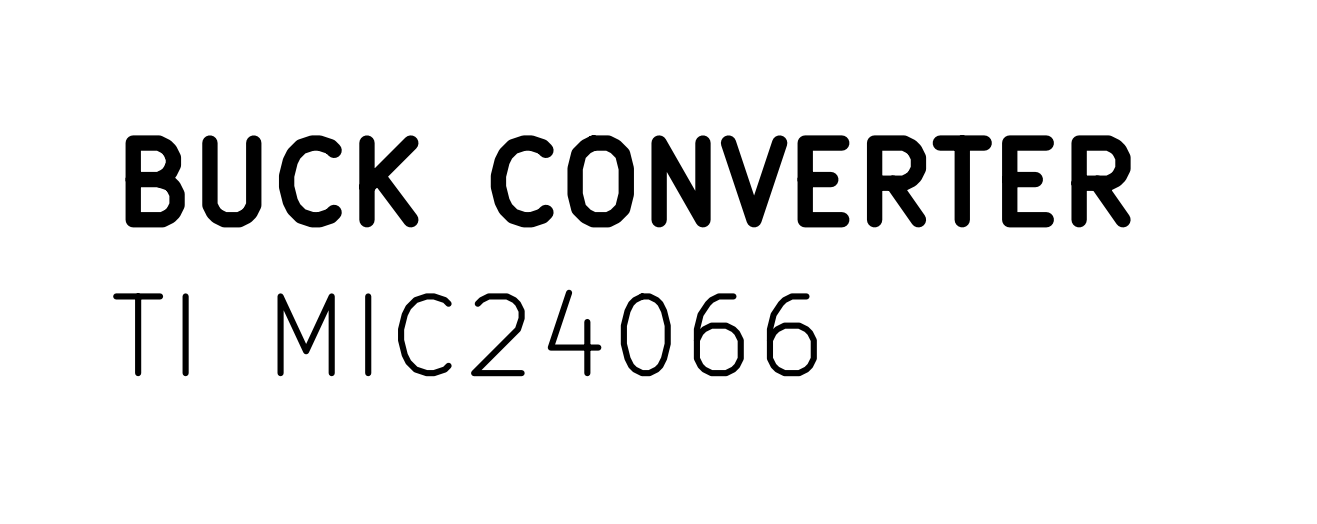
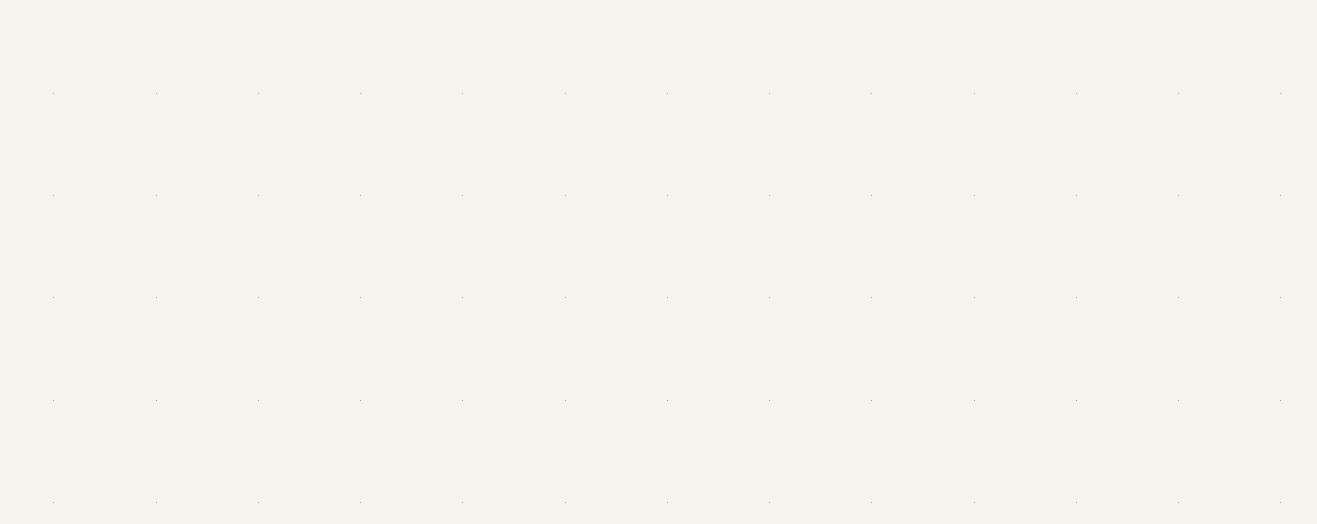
label: BUCK CONVERTER (628, 181) -> none
label: TI MIC24066 (465, 332) -> none

